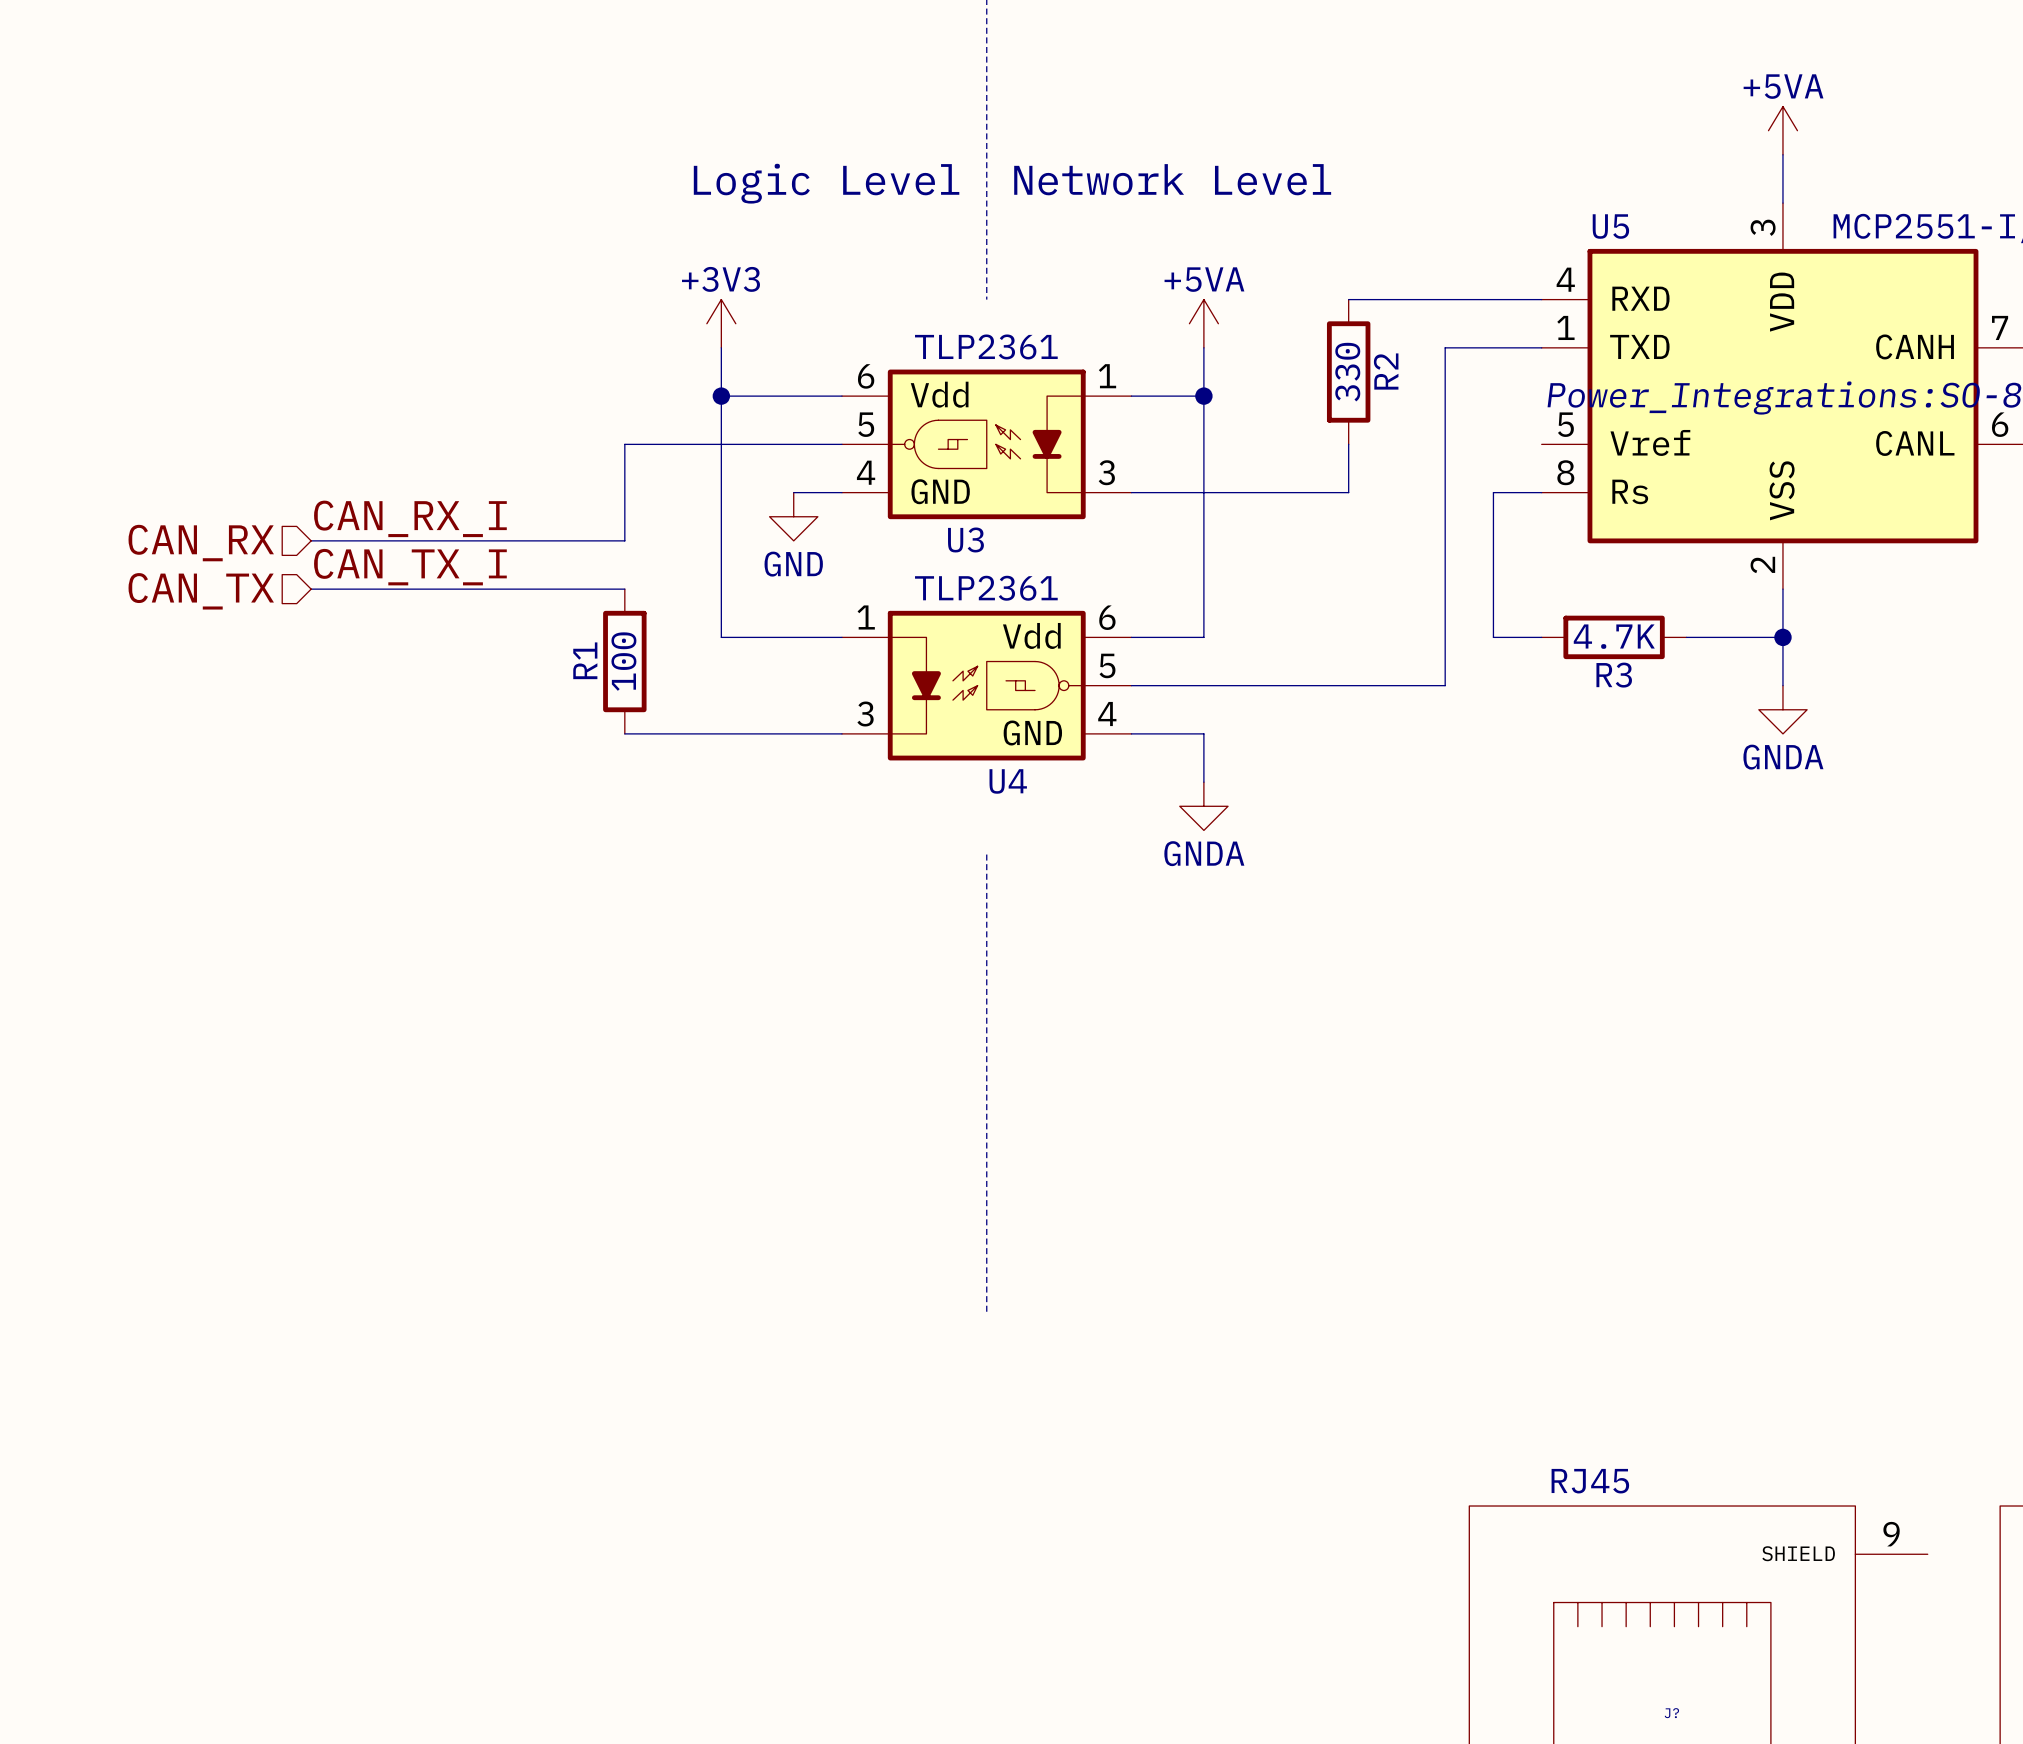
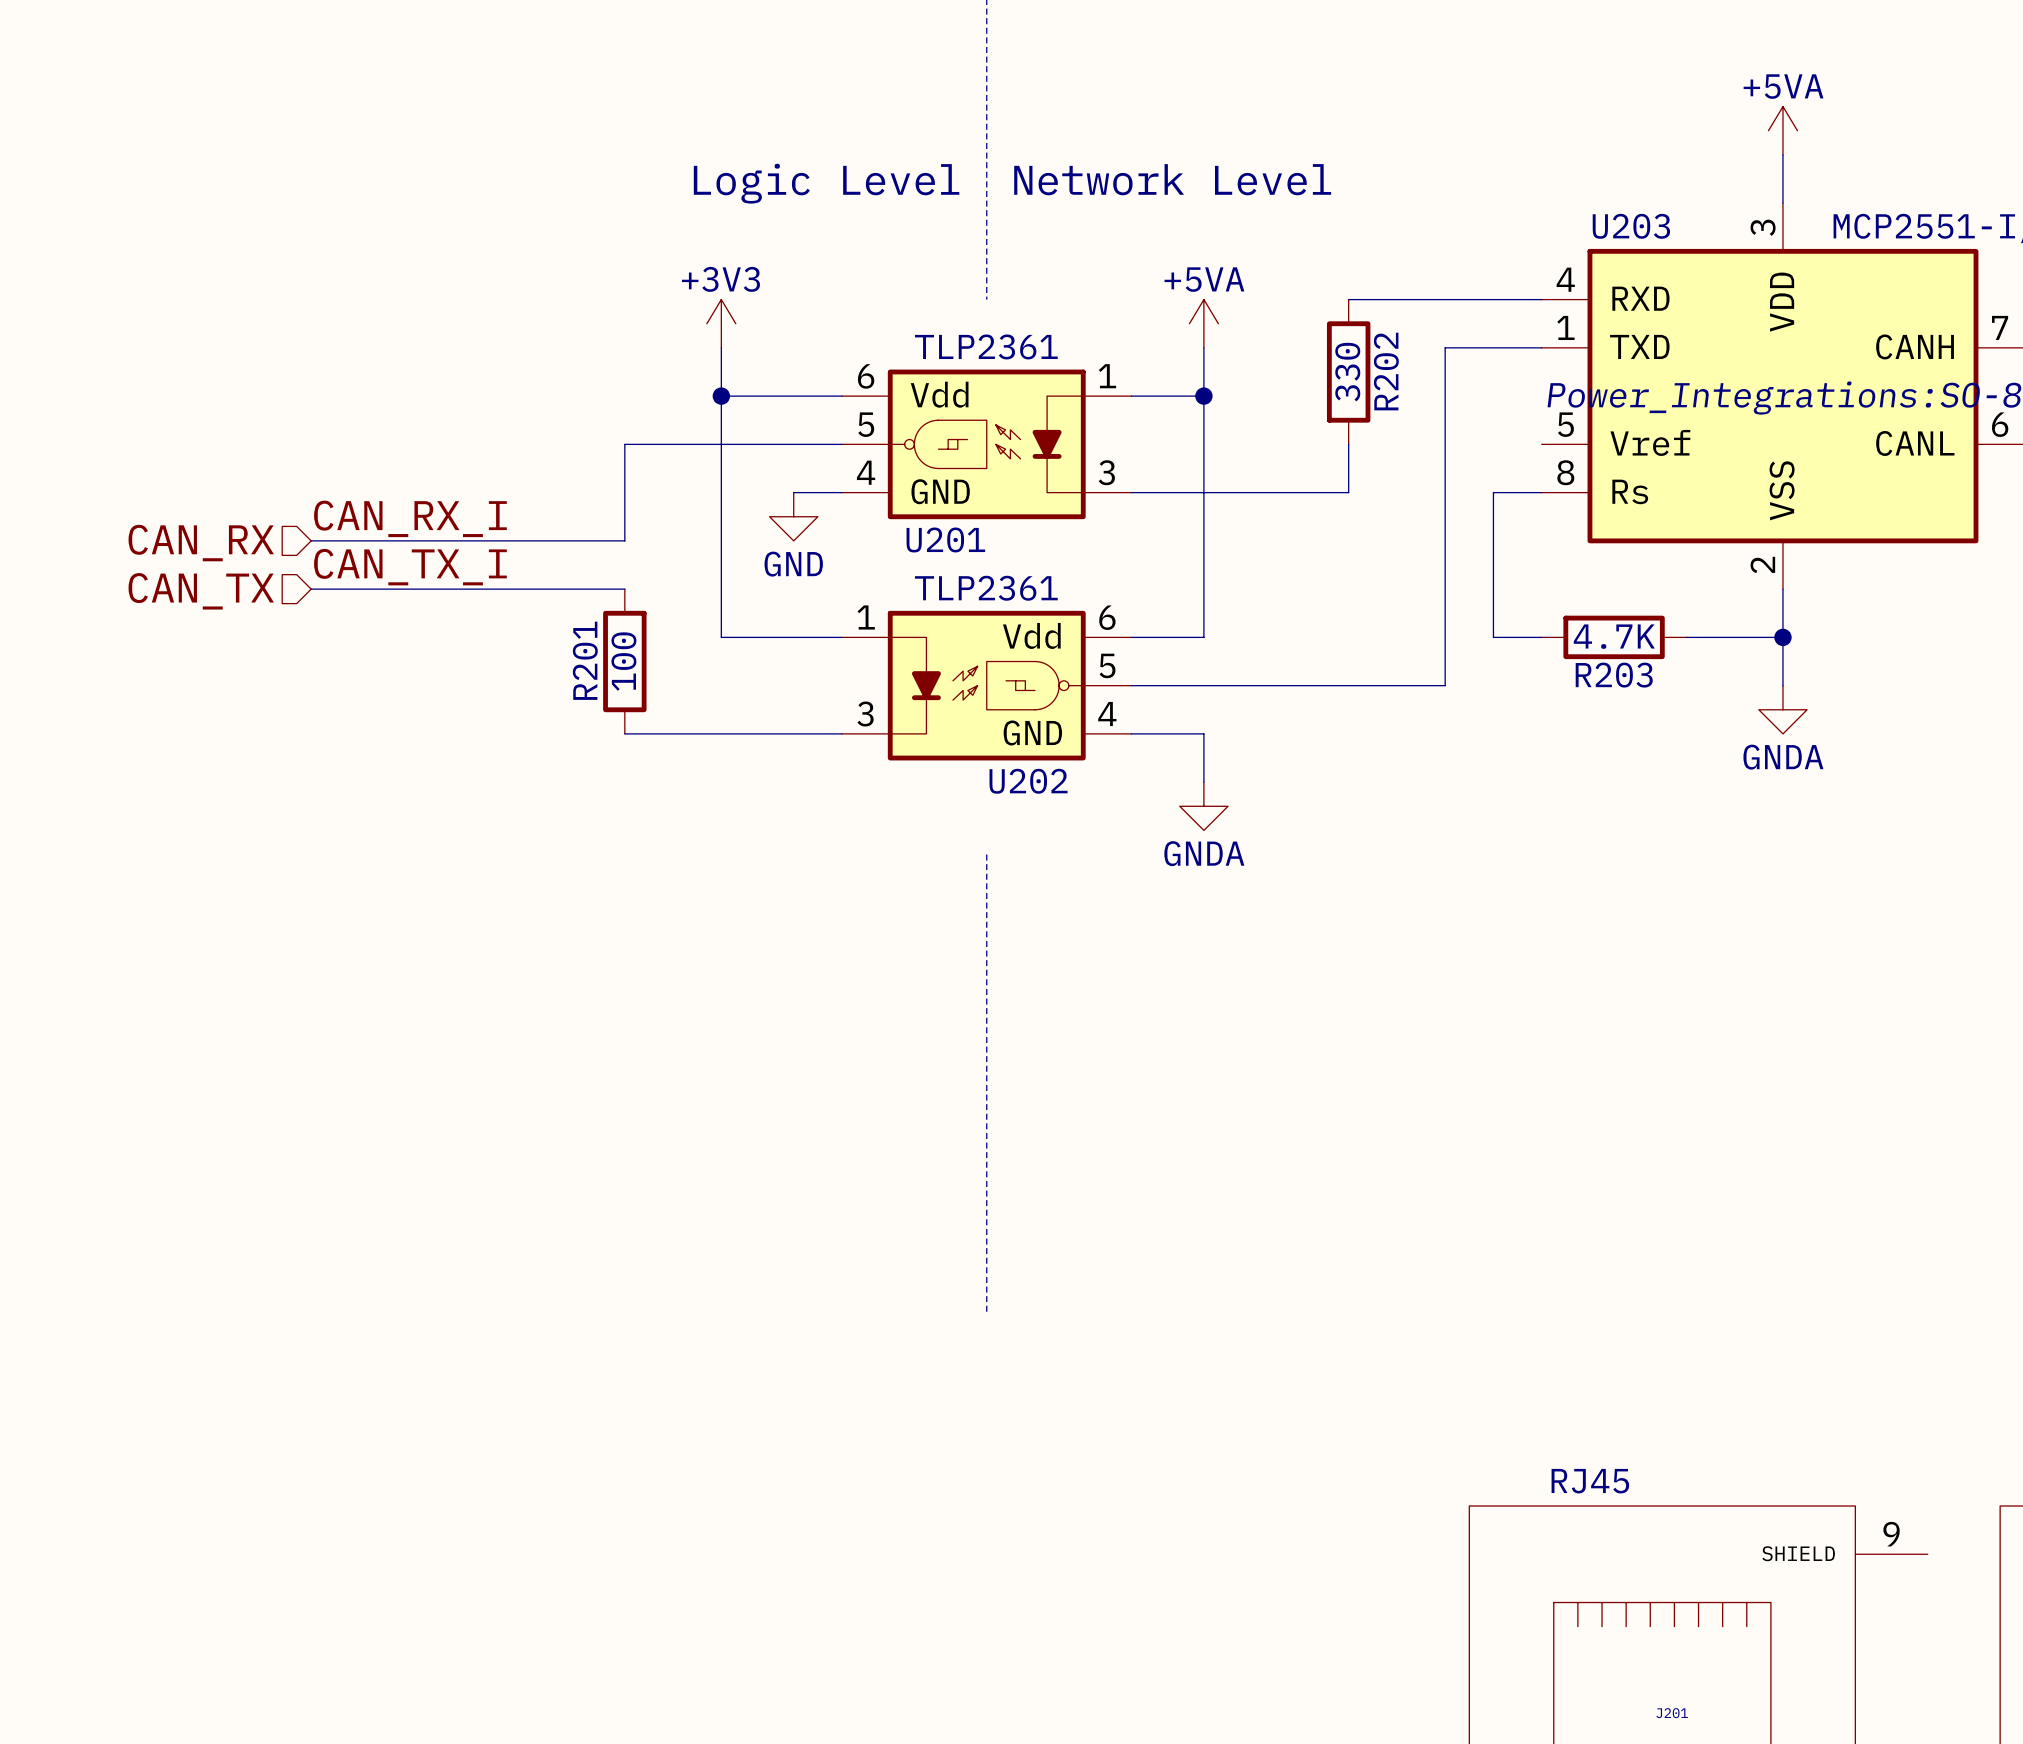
U5 name: U5 (1610, 226) -> U203 (1631, 226)
R2 name: R2 (1386, 371) -> R202 (1386, 371)
U3 name: U3 (965, 539) -> U201 (945, 539)
R1 name: R1 (585, 660) -> R201 (585, 660)
R3 name: R3 (1614, 675) -> R203 (1614, 675)
U4 name: U4 (1008, 781) -> U202 (1028, 781)
J? name: J? (1671, 1713) -> J201 (1672, 1713)

